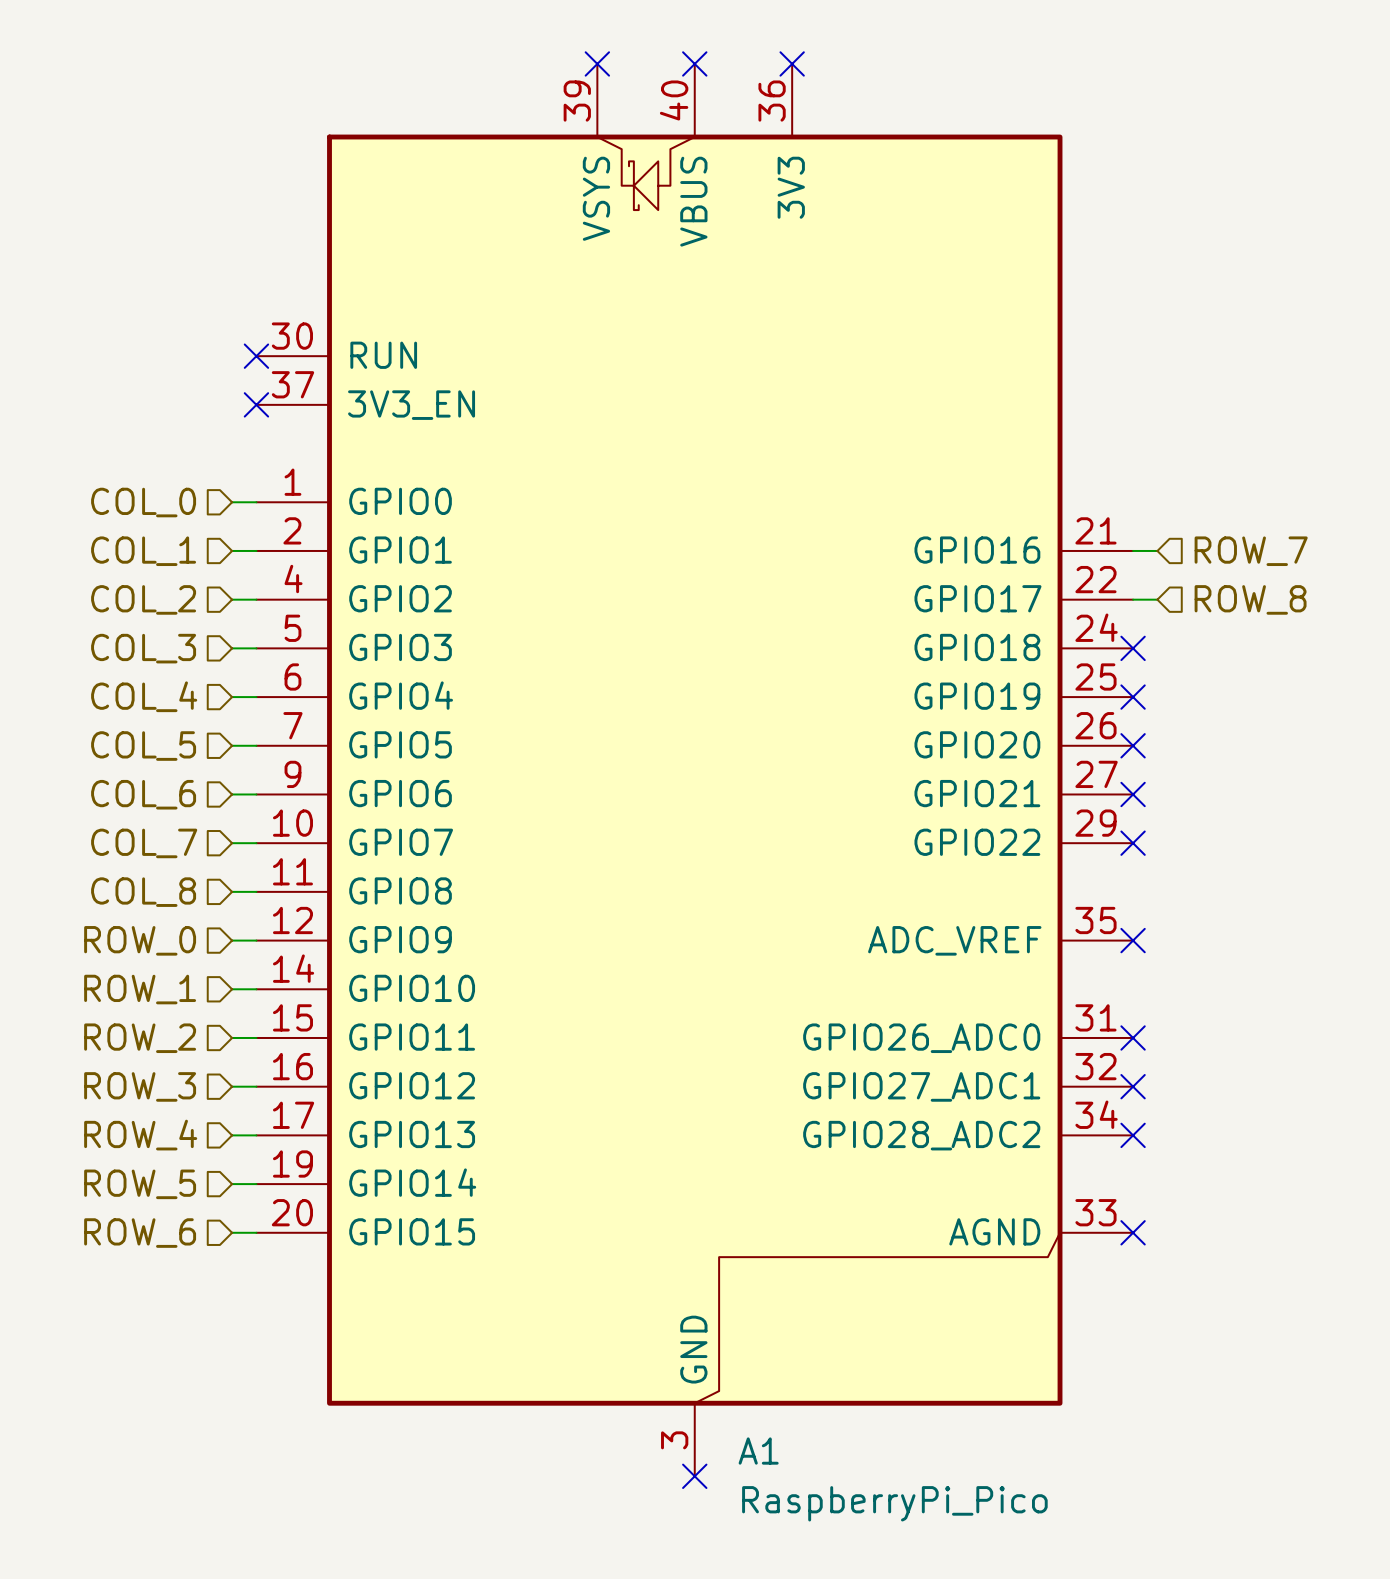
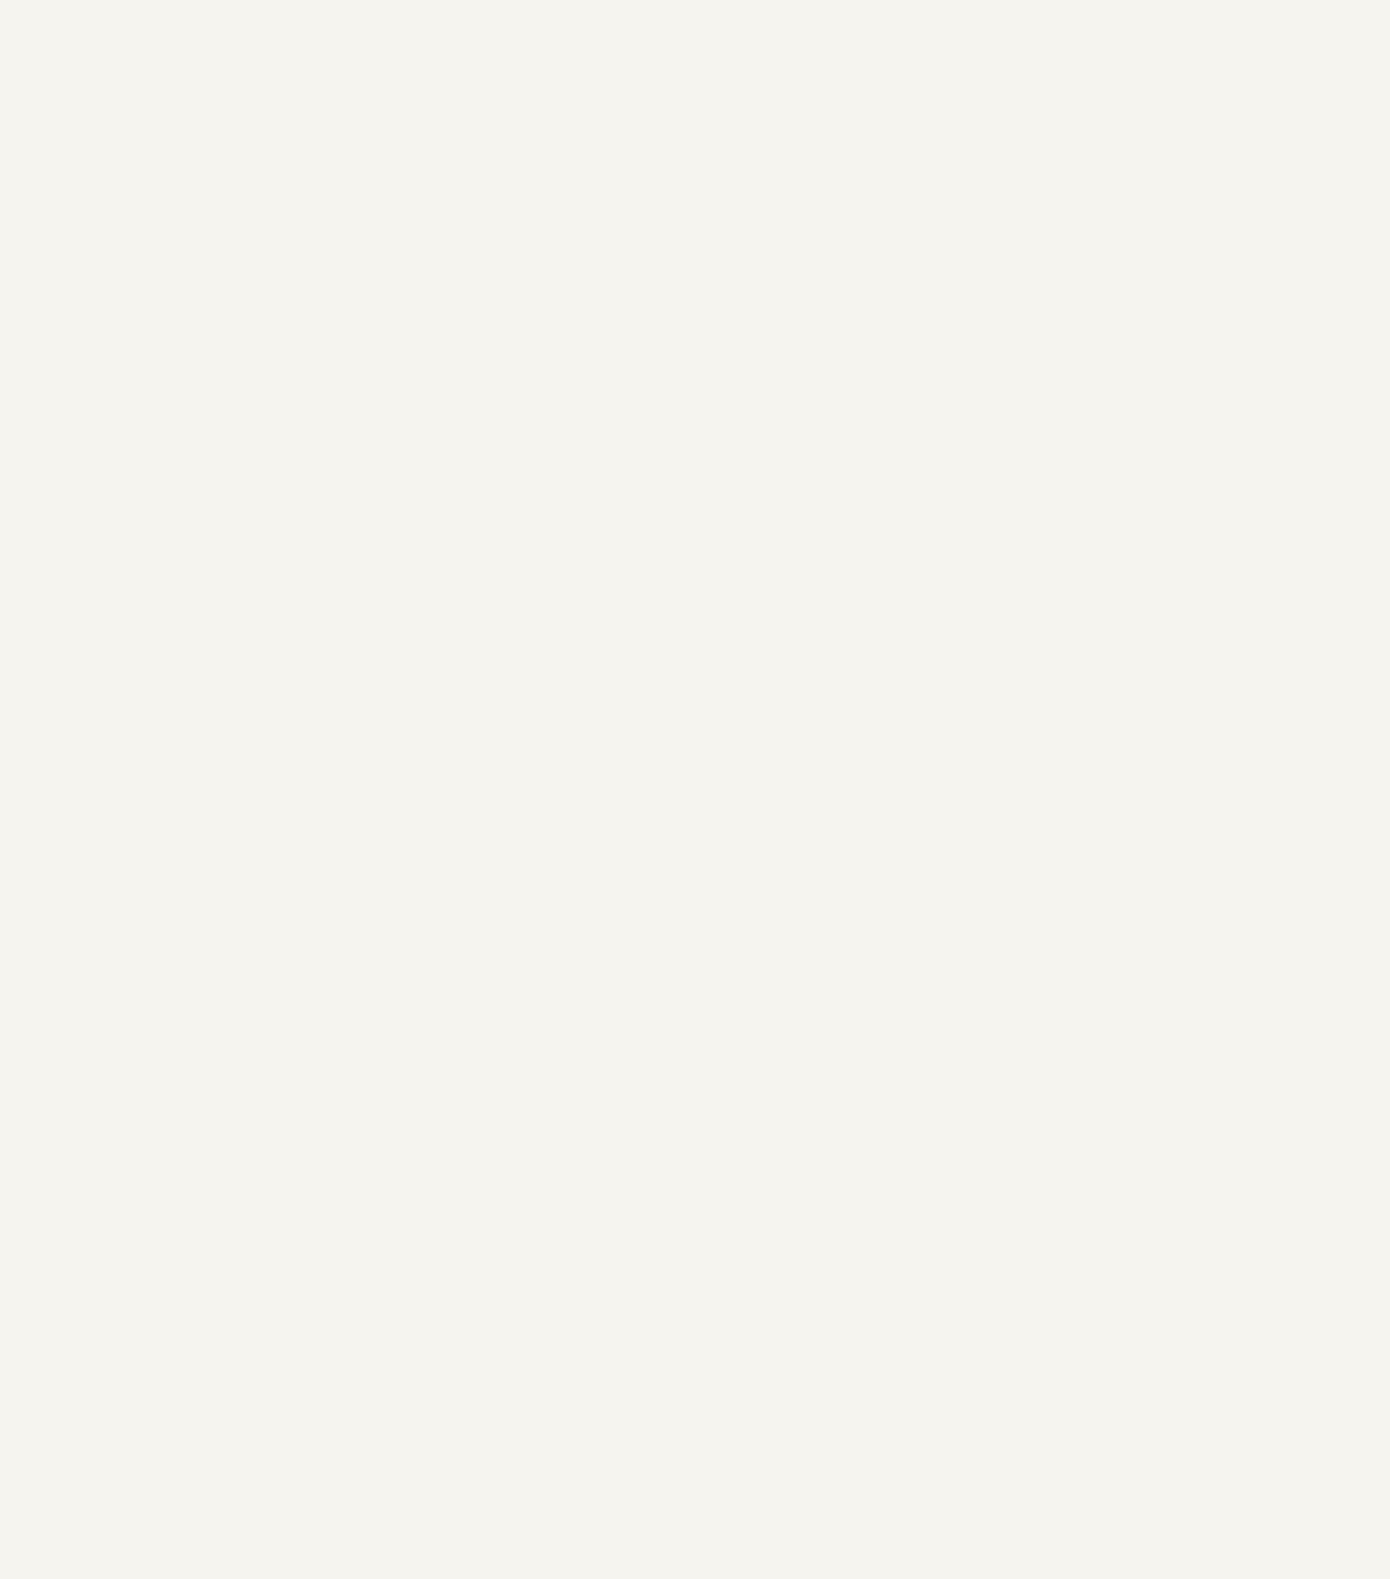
no-connect mark: (597, 63) -> none
no-connect mark: (694, 63) -> none
no-connect mark: (792, 63) -> none
no-connect mark: (256, 356) -> none
no-connect mark: (256, 404) -> none
hierarchical label: COL_0 (143, 502) -> none
wire: (232, 502) (256, 502) -> none
wire: (232, 550) (256, 550) -> none
wire: (1133, 550) (1157, 550) -> none
hierarchical label: COL_1 (143, 551) -> none
hierarchical label: ROW_7 (1251, 551) -> none
hierarchical label: COL_2 (143, 599) -> none
wire: (232, 599) (256, 599) -> none
wire: (1133, 599) (1157, 599) -> none
hierarchical label: ROW_8 (1250, 599) -> none
hierarchical label: COL_3 (143, 648) -> none
wire: (232, 648) (256, 648) -> none
no-connect mark: (1133, 648) -> none
hierarchical label: COL_4 (144, 696) -> none
wire: (232, 697) (256, 697) -> none
no-connect mark: (1133, 697) -> none
wire: (232, 745) (256, 745) -> none
no-connect mark: (1133, 745) -> none
hierarchical label: COL_5 (143, 746) -> none
A1: RaspberryPi_Pico (694, 770) -> none
hierarchical label: COL_6 (143, 794) -> none
wire: (232, 794) (256, 794) -> none
no-connect mark: (1133, 794) -> none
hierarchical label: COL_7 (144, 843) -> none
wire: (232, 843) (256, 843) -> none
no-connect mark: (1133, 843) -> none
wire: (232, 891) (256, 891) -> none
hierarchical label: COL_8 (143, 892) -> none
hierarchical label: ROW_0 (140, 940) -> none
wire: (232, 940) (256, 940) -> none
no-connect mark: (1133, 940) -> none
hierarchical label: ROW_1 (140, 989) -> none
wire: (232, 989) (256, 989) -> none
wire: (232, 1037) (256, 1037) -> none
no-connect mark: (1133, 1037) -> none
hierarchical label: ROW_2 (140, 1038) -> none
hierarchical label: ROW_3 (140, 1086) -> none
wire: (232, 1086) (256, 1086) -> none
no-connect mark: (1133, 1086) -> none
hierarchical label: ROW_4 (140, 1135) -> none
wire: (232, 1135) (256, 1135) -> none
no-connect mark: (1133, 1135) -> none
hierarchical label: ROW_5 (140, 1184) -> none
wire: (232, 1184) (256, 1184) -> none
wire: (232, 1232) (256, 1232) -> none
no-connect mark: (1133, 1232) -> none
hierarchical label: ROW_6 (140, 1233) -> none
no-connect mark: (694, 1476) -> none

